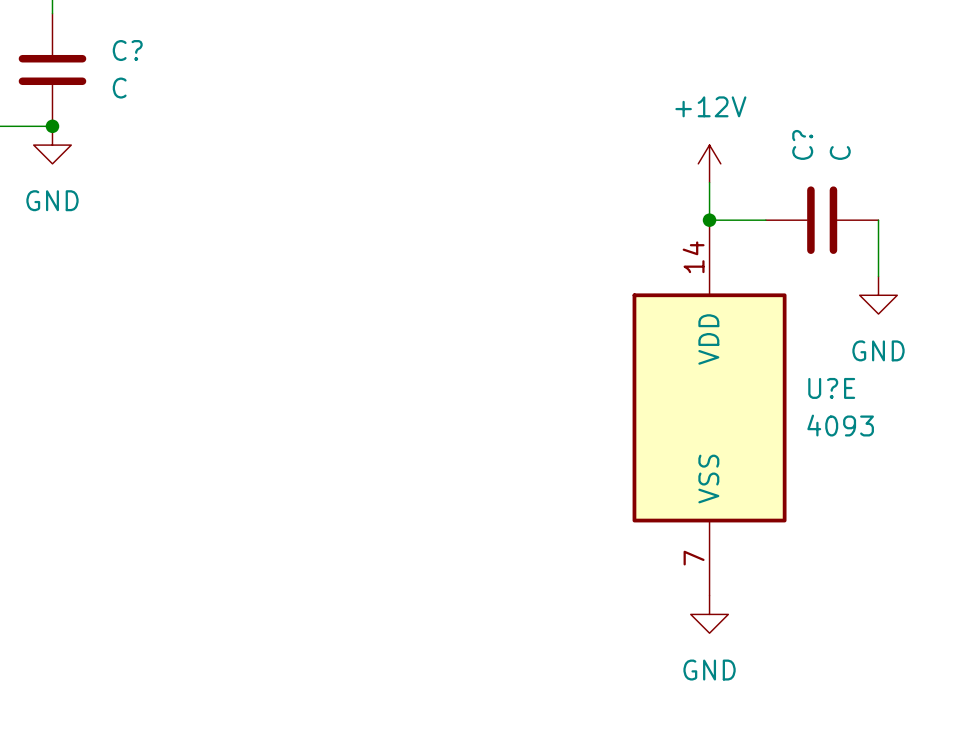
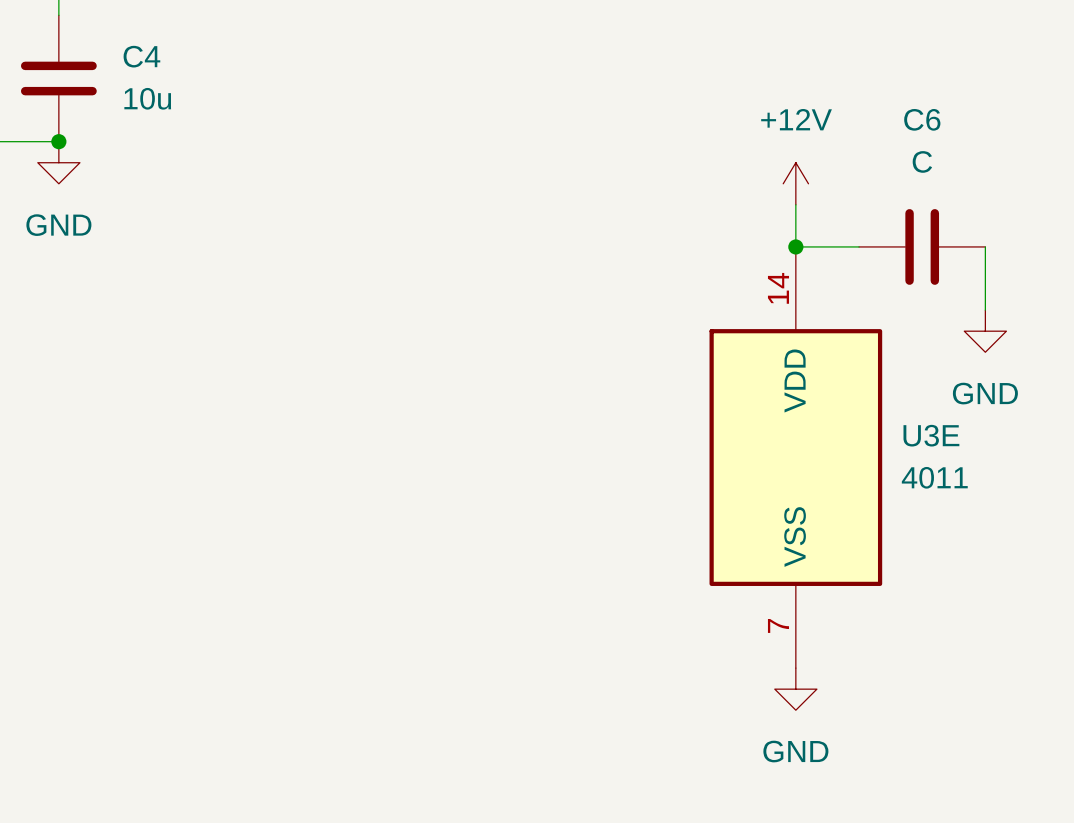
C? name: C? (127, 50) -> C4 (141, 56)
C? value: C (119, 88) -> 10u (147, 98)
C? name: C? (802, 144) -> C6 (922, 119)
C? value rotation: 0° (840, 152) -> 90° clockwise (922, 161)
U?E name: U?E (831, 388) -> U3E (931, 435)
U?E value: 4093 (840, 425) -> 4011 (934, 477)

